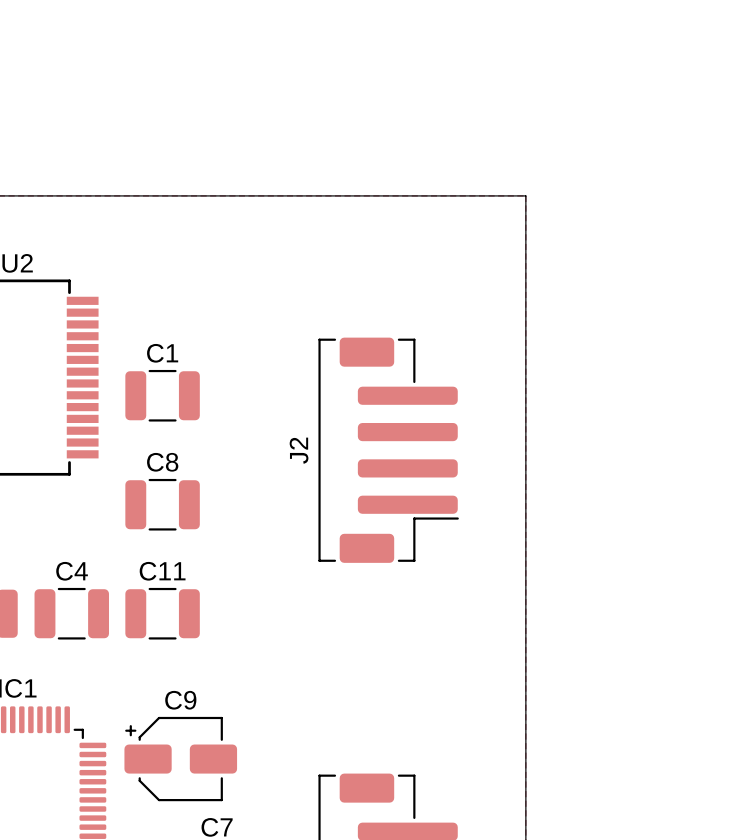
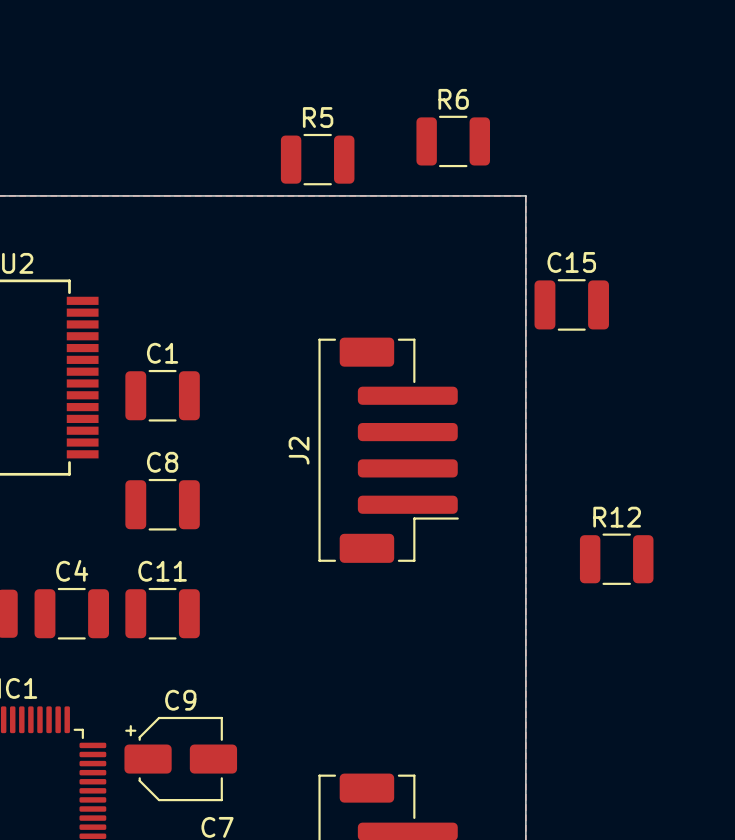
R6: none -> (453, 141)
R5: none -> (317, 159)
C15: none -> (571, 304)
R12: none -> (616, 559)

